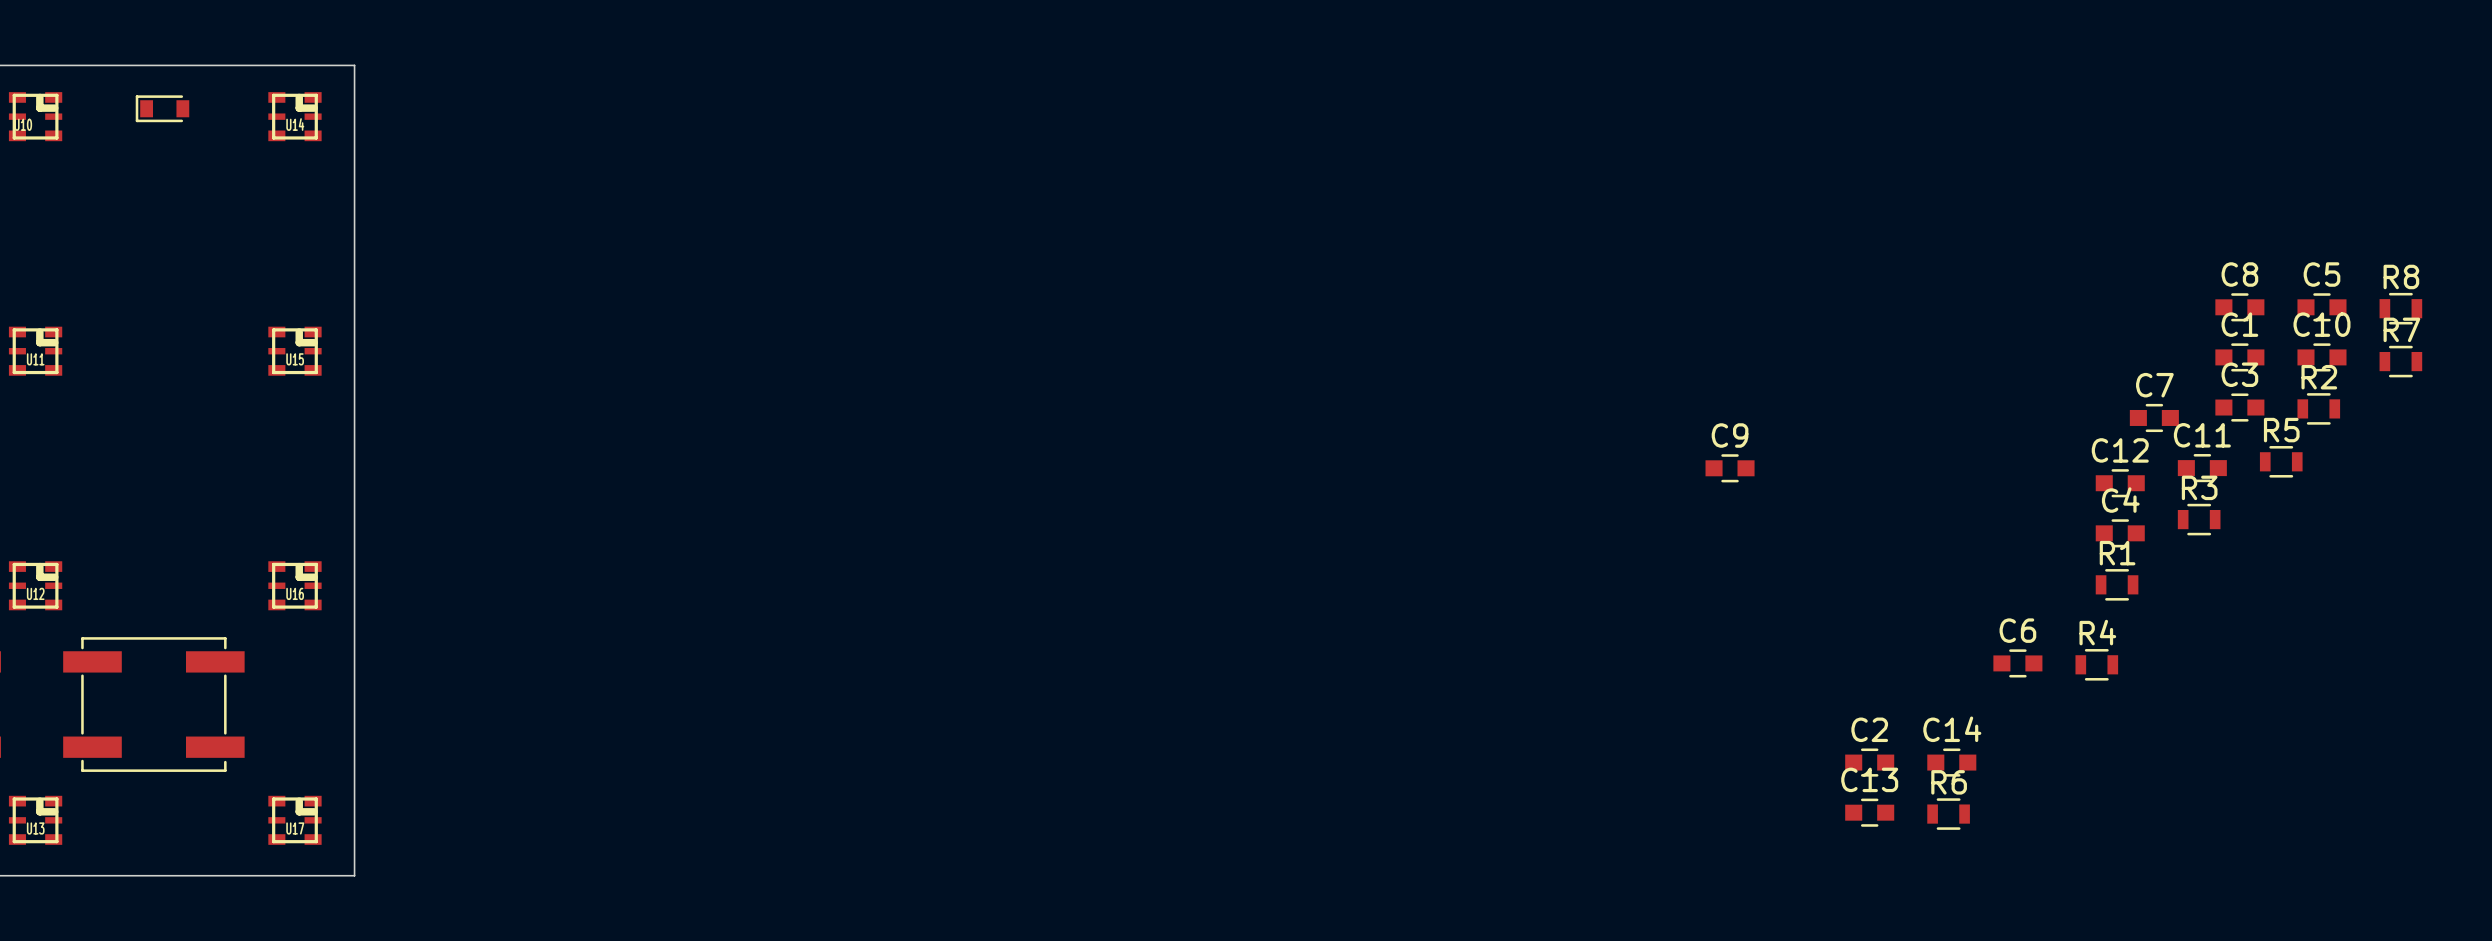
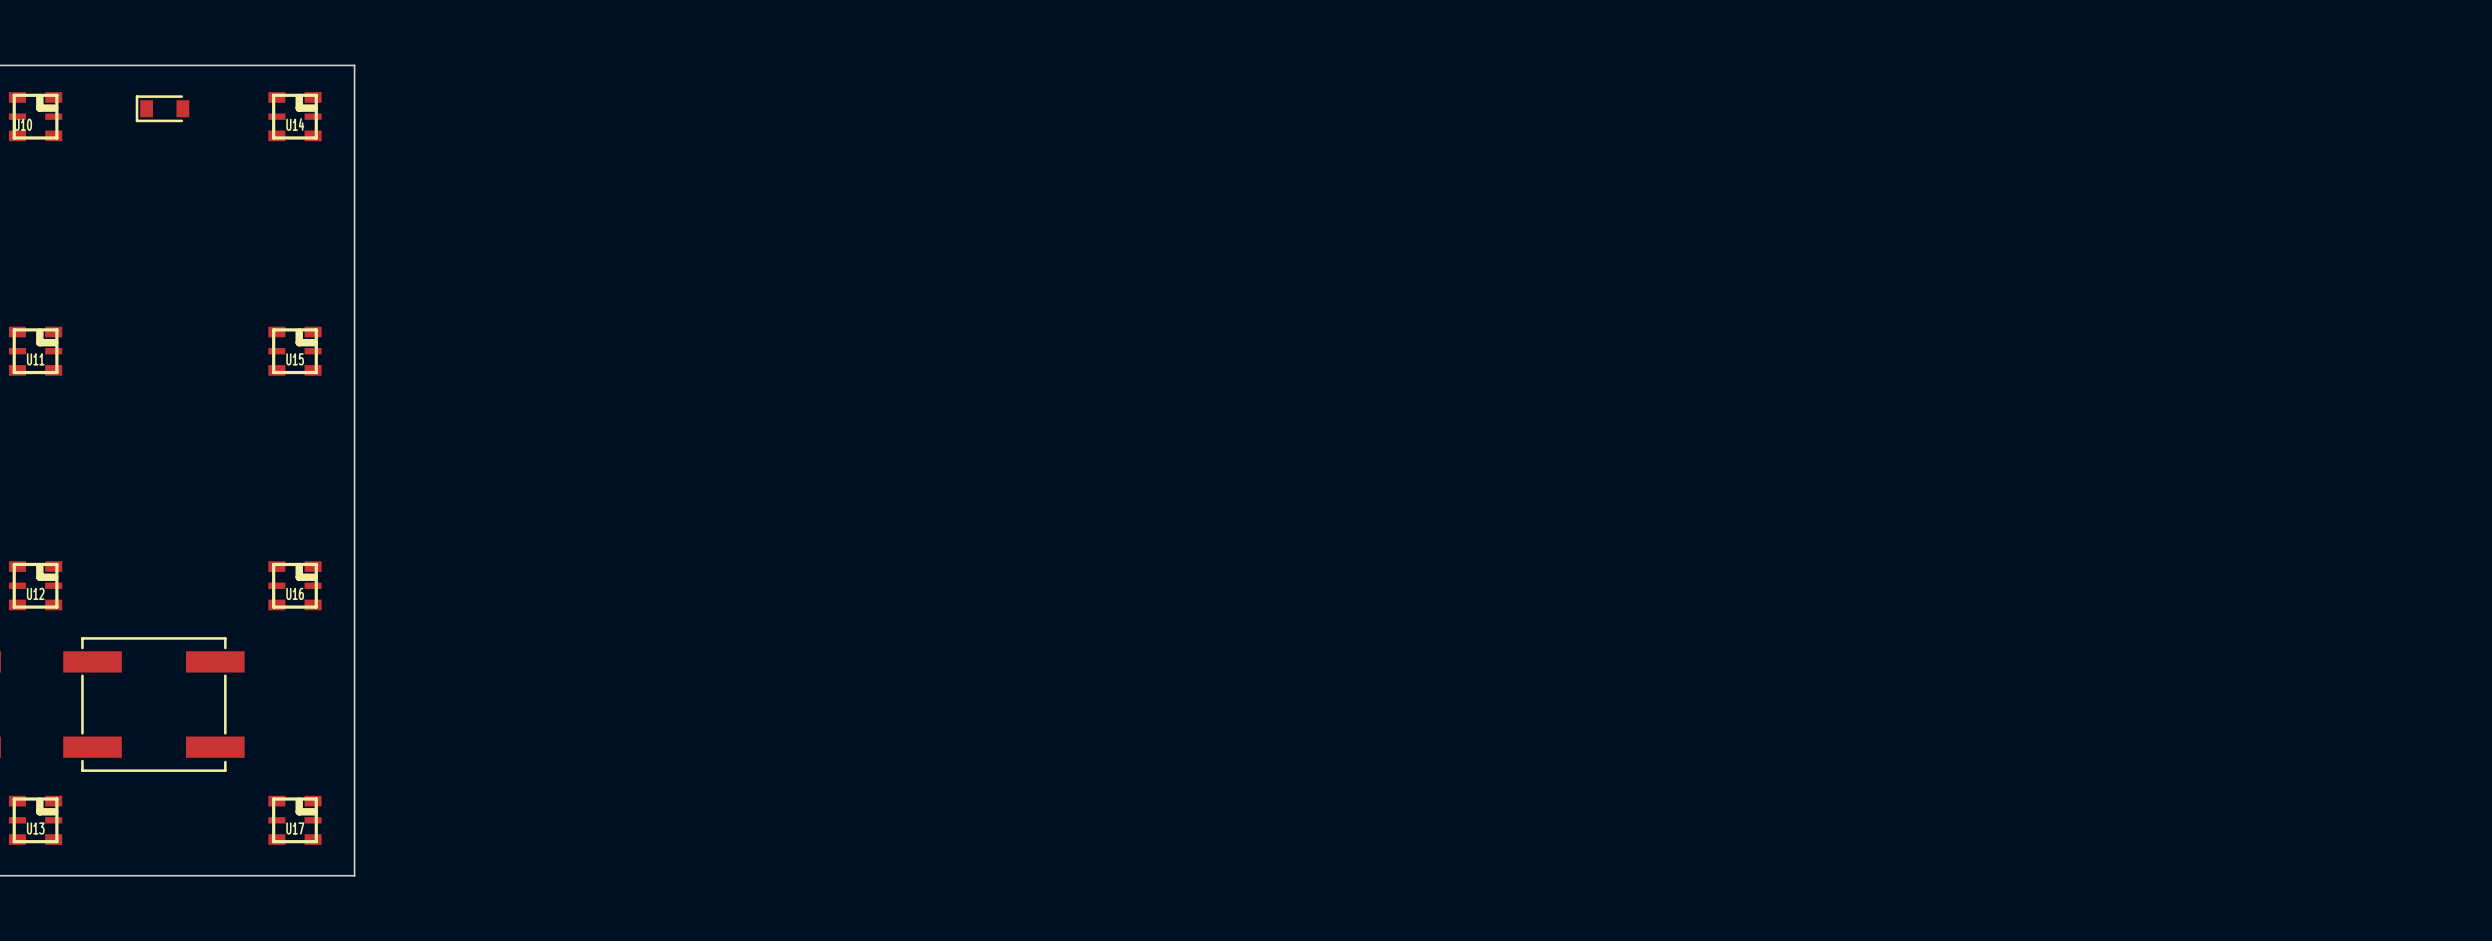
C8: (2239, 307) -> none
C5: (2321, 307) -> none
R8: (2400, 308) -> none
C1: (2239, 357) -> none
C10: (2321, 357) -> none
R7: (2400, 361) -> none
C3: (2239, 407) -> none
R2: (2318, 408) -> none
C7: (2154, 417) -> none
R5: (2281, 461) -> none
C9: (1730, 468) -> none
C11: (2202, 468) -> none
C12: (2120, 483) -> none
R3: (2199, 519) -> none
C4: (2120, 533) -> none
R1: (2117, 584) -> none
C6: (2017, 663) -> none
R4: (2096, 664) -> none
C2: (1869, 762) -> none
C14: (1951, 762) -> none
C13: (1869, 812) -> none
R6: (1948, 814) -> none

